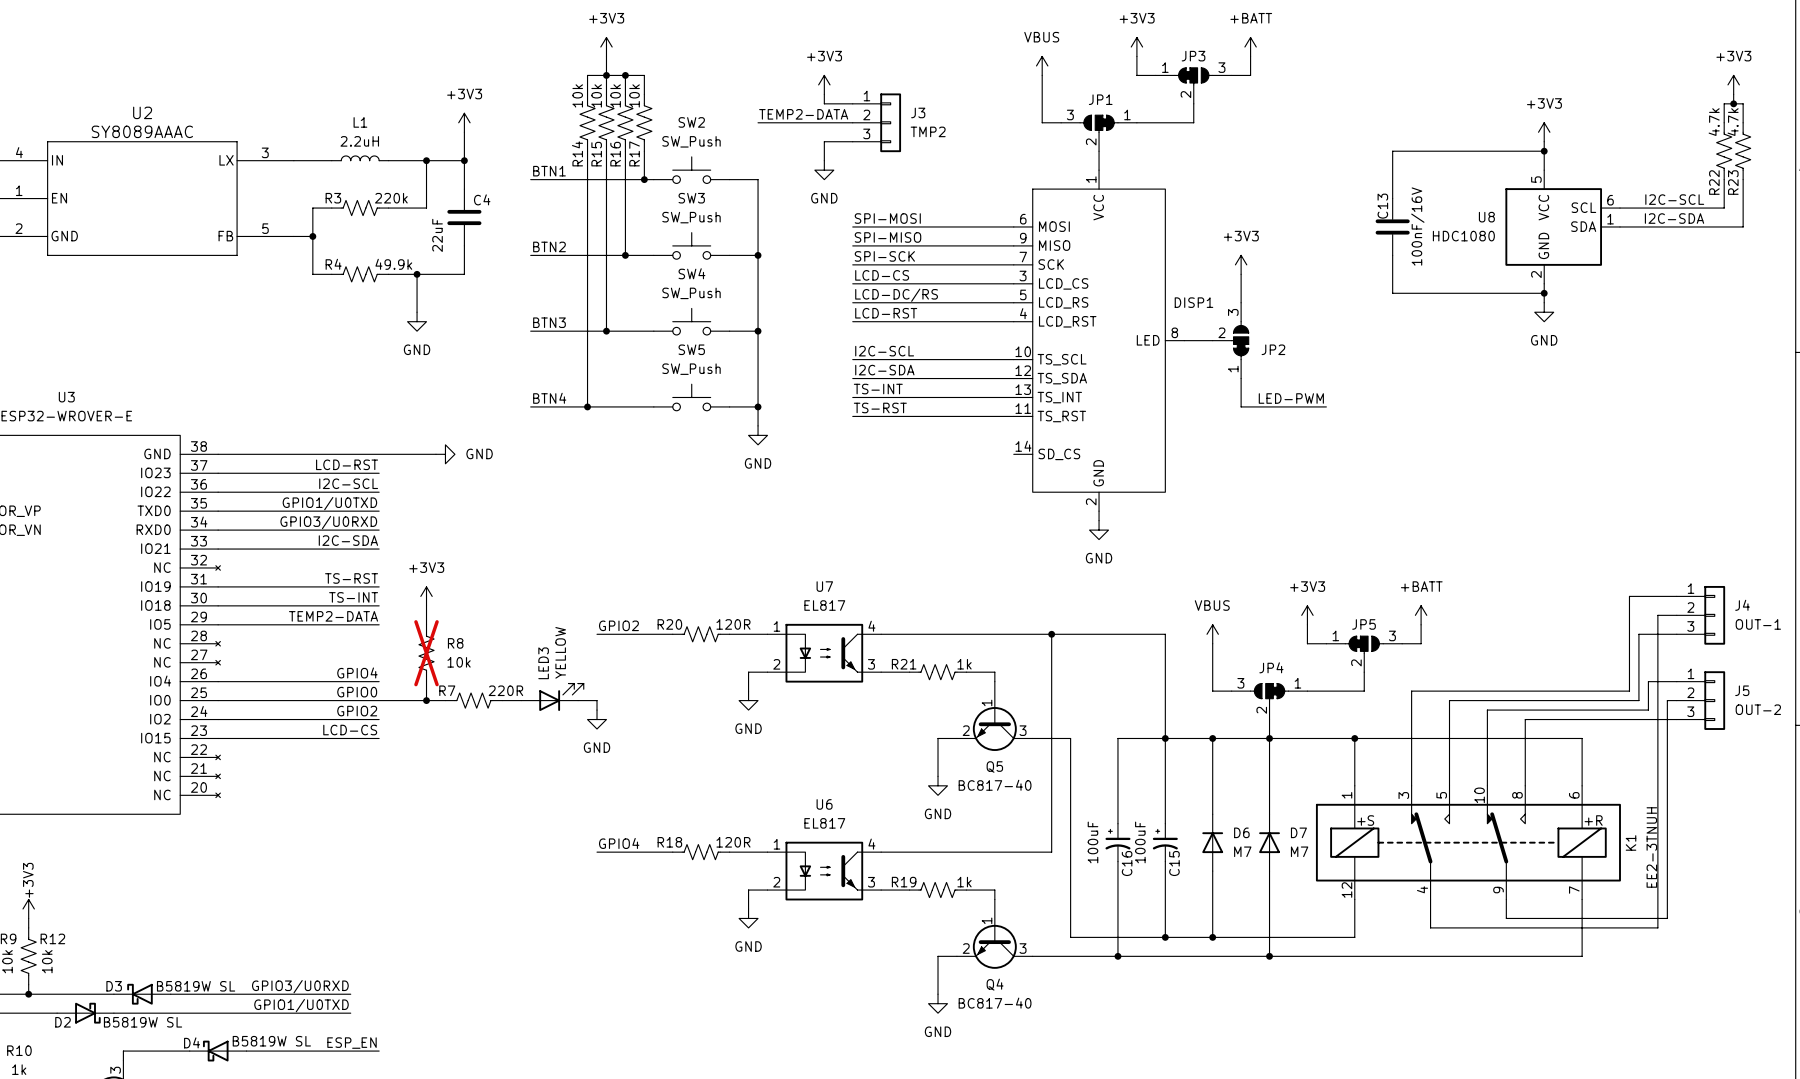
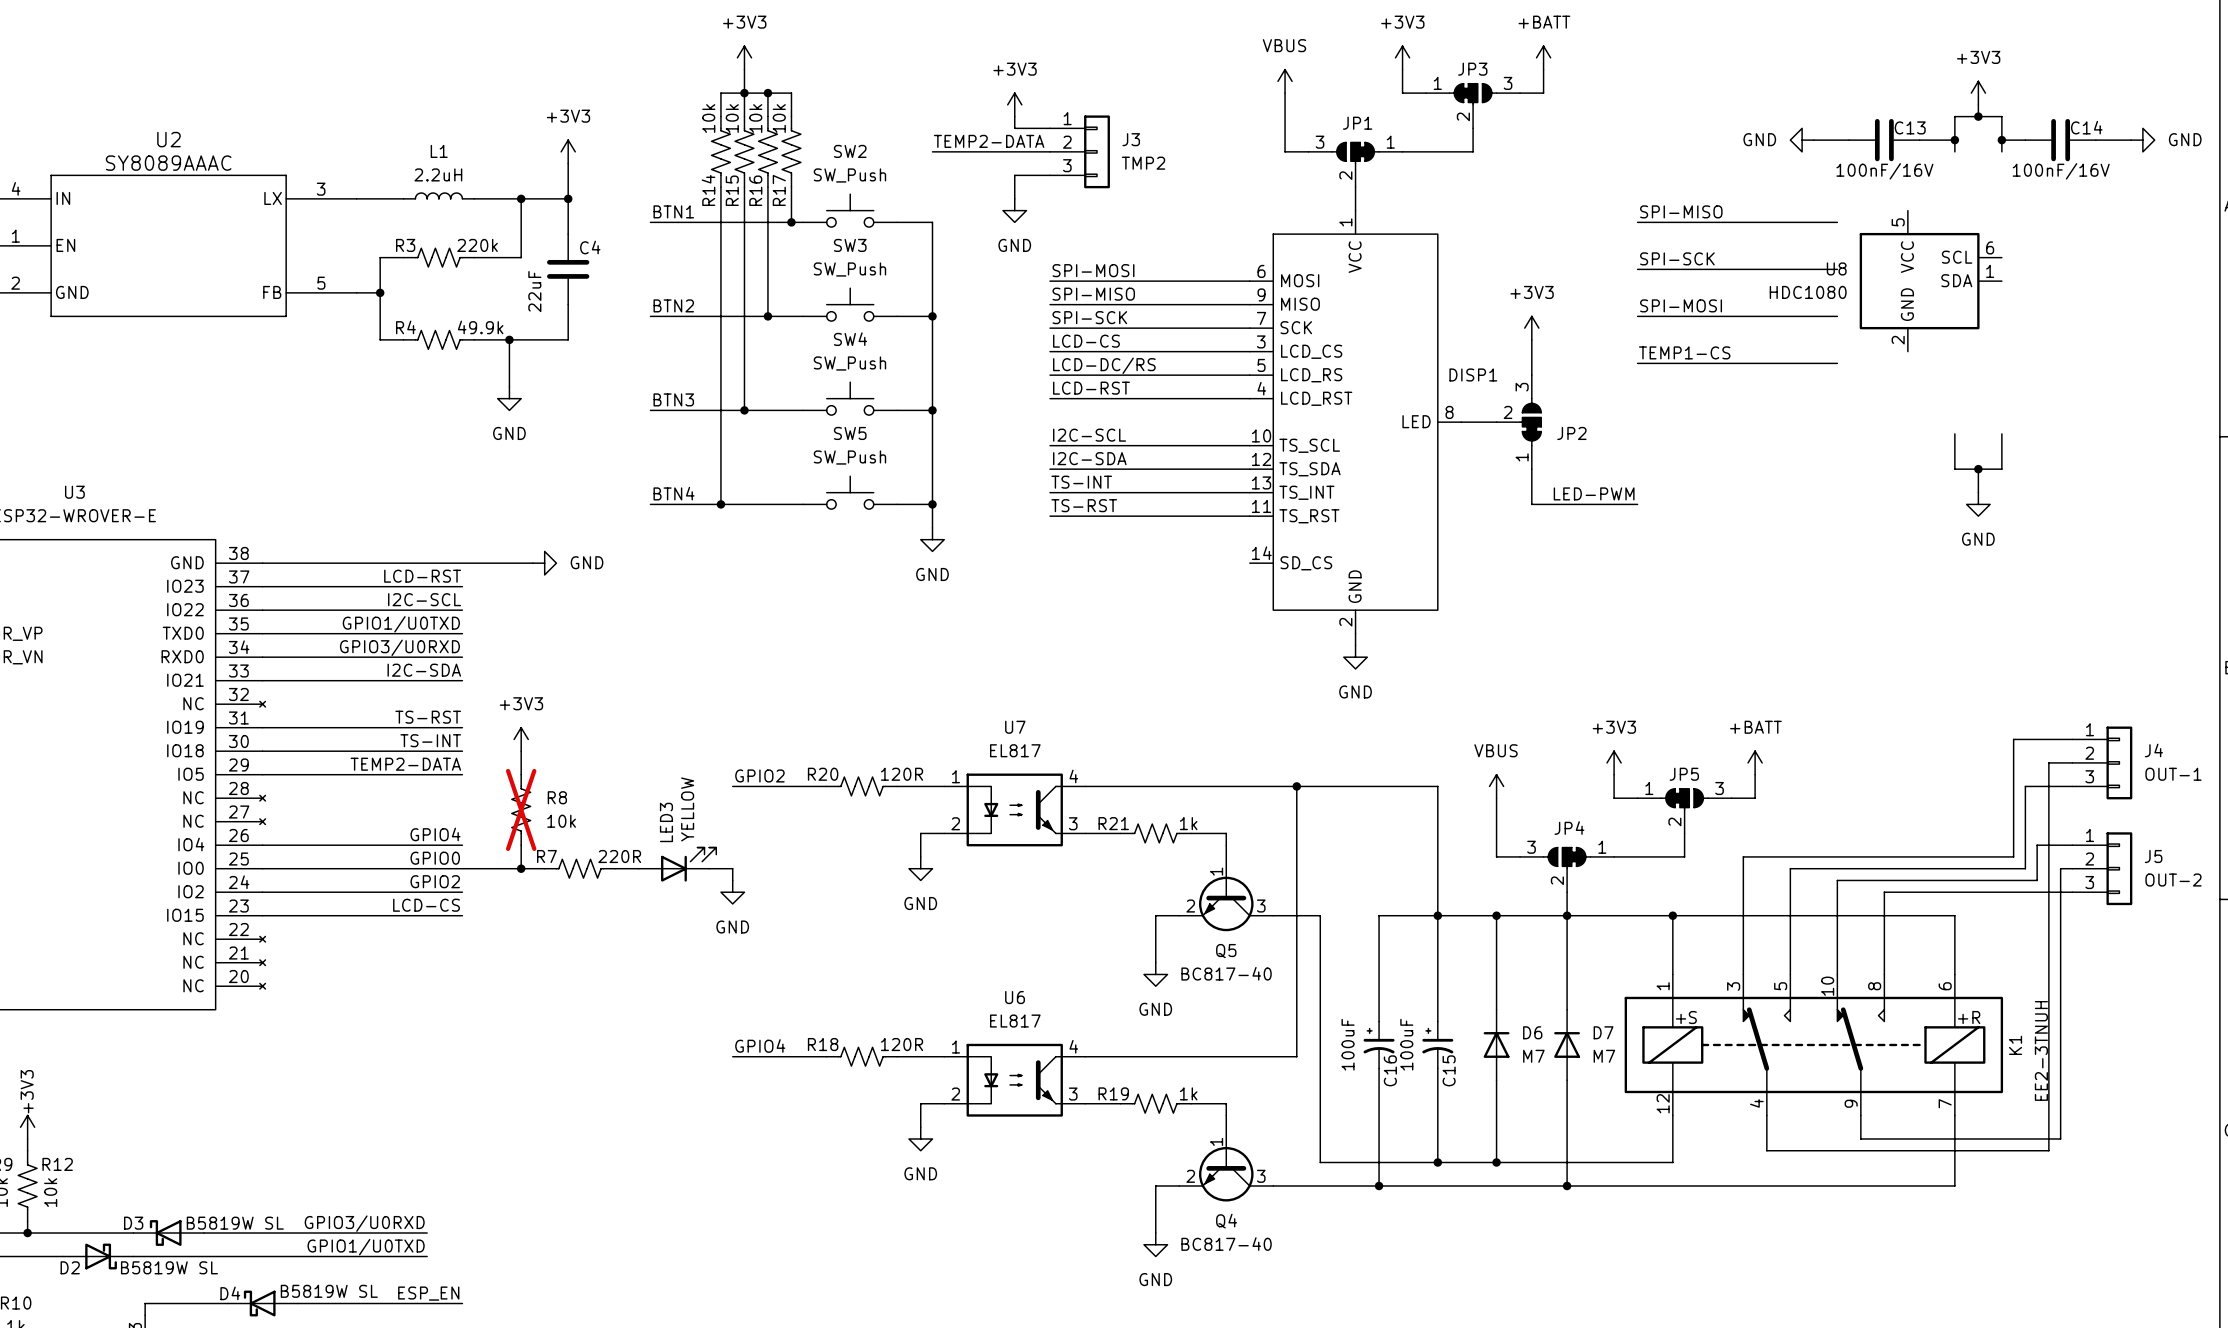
power symbol: none -> +3V3 (1978, 93)
power symbol: +3V3 (1733, 84) -> none
junction: none -> (1978, 116)
wire: (1733, 94) (1733, 103) -> (1978, 104) (1978, 116)
junction: (1733, 103) -> none
power symbol: none -> GND (1802, 140)
wire: none -> (1813, 140) (1849, 140)
wire: none -> (1919, 140) (1954, 140)
junction: none -> (1954, 140)
wire: none -> (2001, 140) (2025, 140)
junction: none -> (2001, 140)
C14: none -> 100nF/16V (2060, 140)
wire: none -> (2095, 140) (2131, 140)
power symbol: none -> GND (2142, 140)
wire: none -> (1954, 151) (1954, 116) (2001, 116) (2001, 151)
wire: (1724, 122) (1724, 103) (1743, 103) (1743, 122) -> none
power symbol: +3V3 (1544, 132) -> none
wire: (1544, 141) (1544, 170) -> none
wire: (1544, 151) (1392, 151) (1392, 198) -> none
junction: (1544, 151) -> none
R22: 4.7k (1724, 151) -> none
R23: 4.7k (1743, 151) -> none
label: none -> SPI-MISO (1681, 211)
wire: none -> (1637, 222) (1837, 222)
wire: (1724, 179) (1724, 208) (1620, 208) -> none
wire: (1743, 179) (1743, 226) (1620, 226) -> none
label: I2C-SCL (1674, 199) -> none
label: none -> SPI-SCK (1677, 258)
wire: none -> (1637, 269) (1837, 269)
label: I2C-SDA (1674, 218) -> none
C13 rotation: 0° (1392, 226) -> 90° clockwise (1884, 140)
C13 position: (1392, 226) -> (1884, 140)
label: none -> SPI-MOSI (1681, 305)
wire: none -> (1637, 316) (1837, 316)
wire: (1392, 255) (1392, 293) -> (1637, 363) (1719, 363)
wire: (1544, 283) (1544, 302) -> (1978, 469) (1978, 492)
label: none -> TEMP1-CS (1684, 352)
wire: (1487, 293) (1544, 293) -> none
junction: (1544, 293) -> none
power symbol: GND (1544, 312) -> none
wire: none -> (1954, 433) (1954, 469) (2001, 469) (2001, 433)
junction: none -> (1978, 469)
power symbol: none -> GND (1978, 504)

